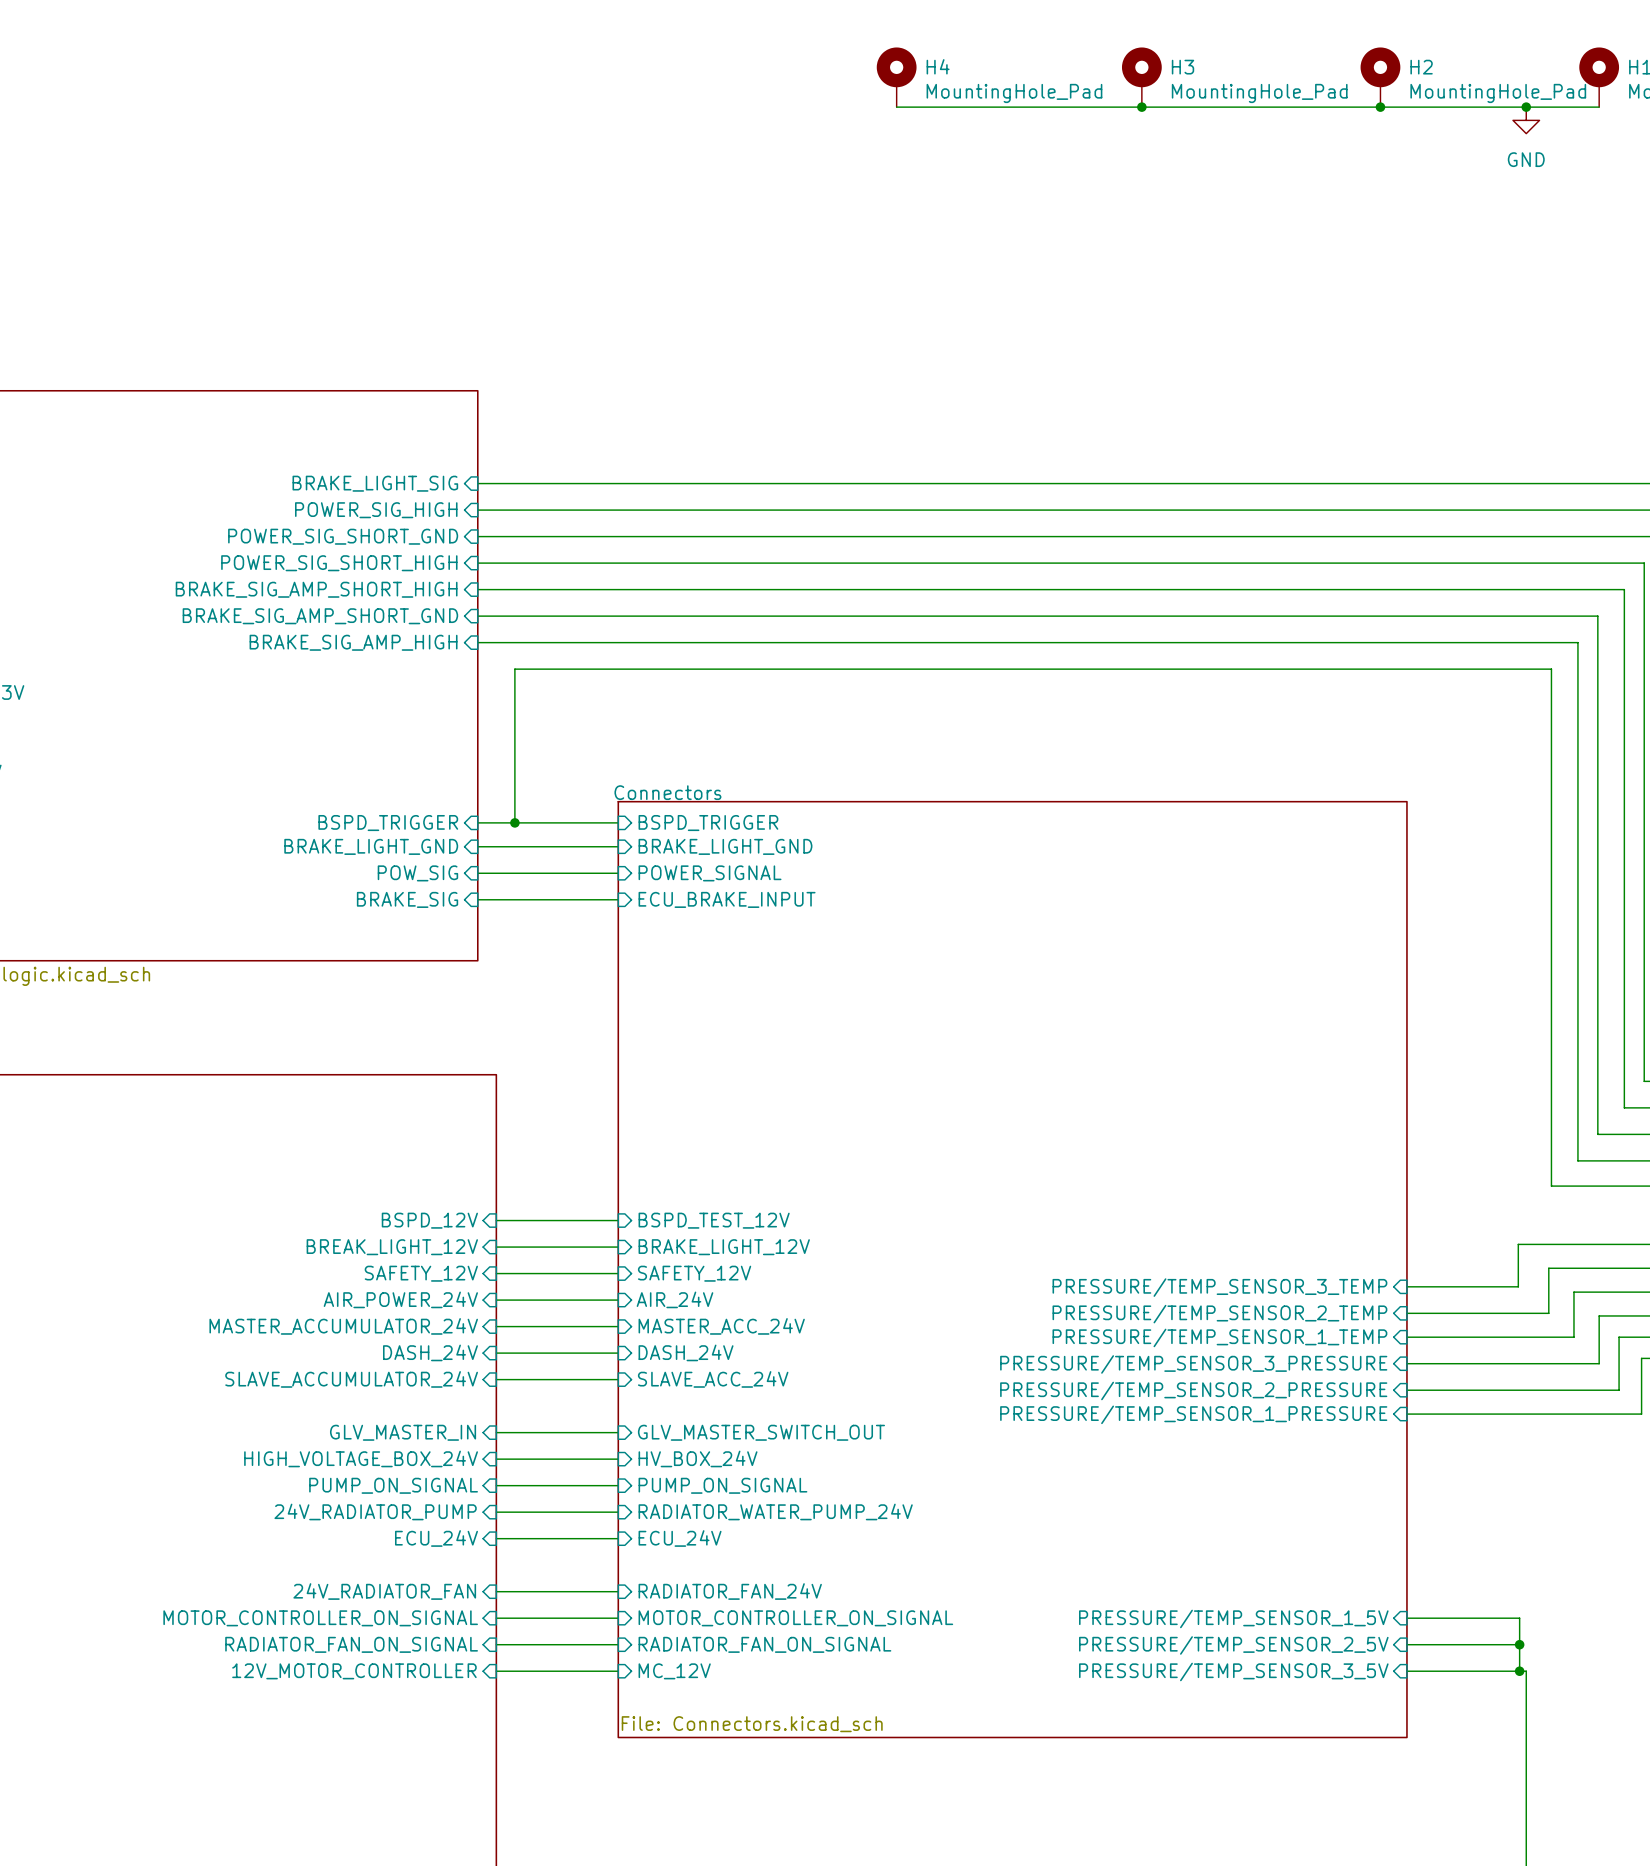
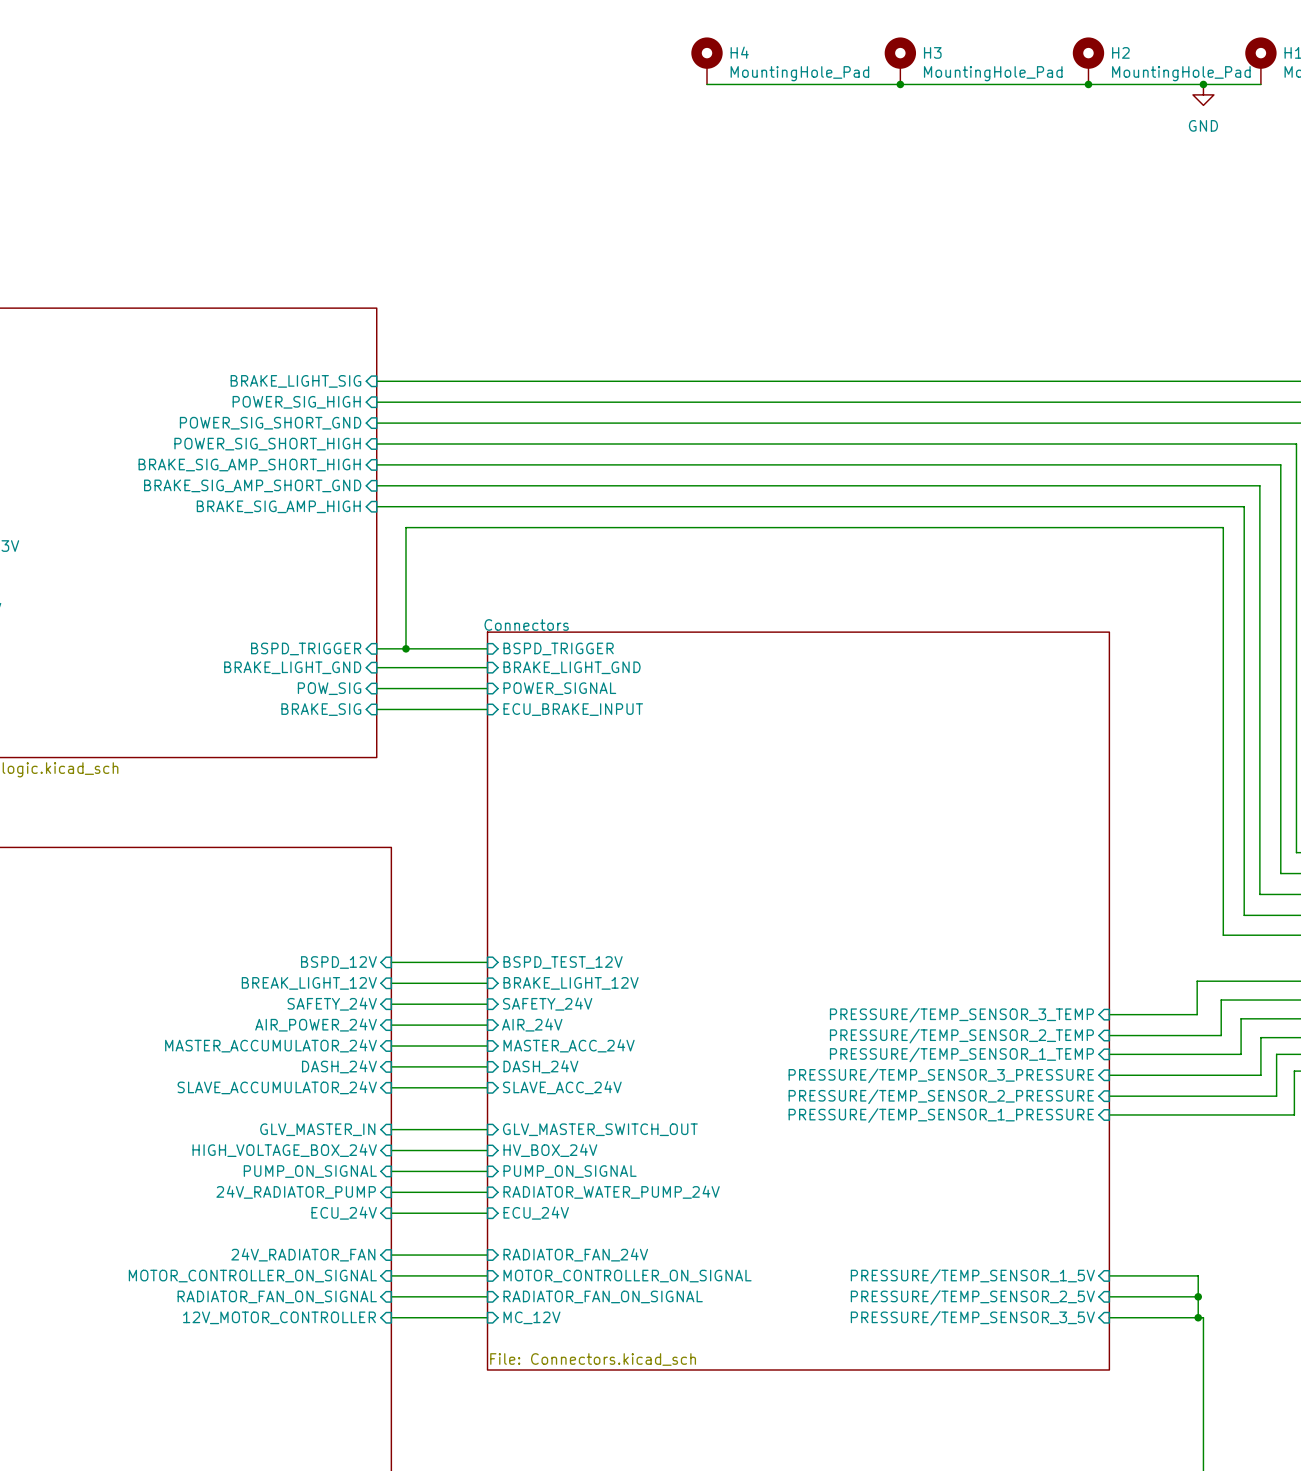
sheet pin: SAFETY_12V (421, 1273) -> SAFETY_24V (332, 1004)
sheet pin: SAFETY_12V (694, 1273) -> SAFETY_24V (547, 1004)

